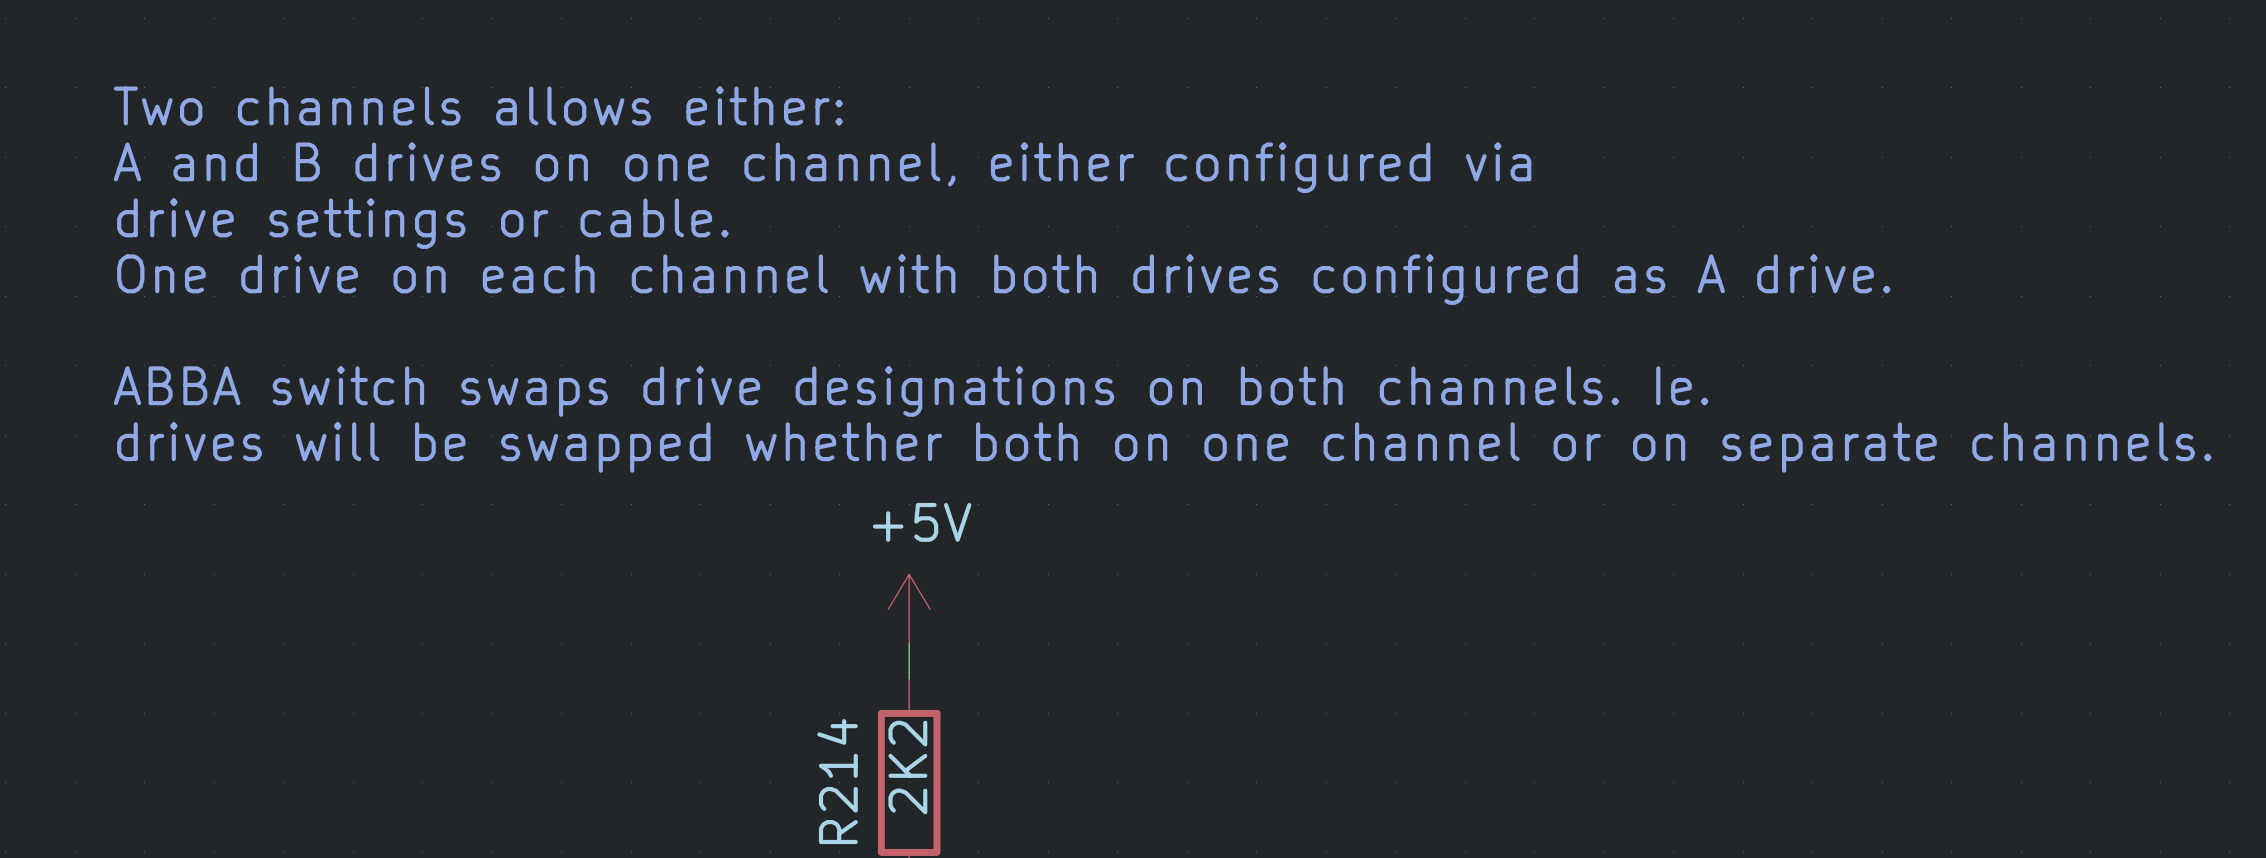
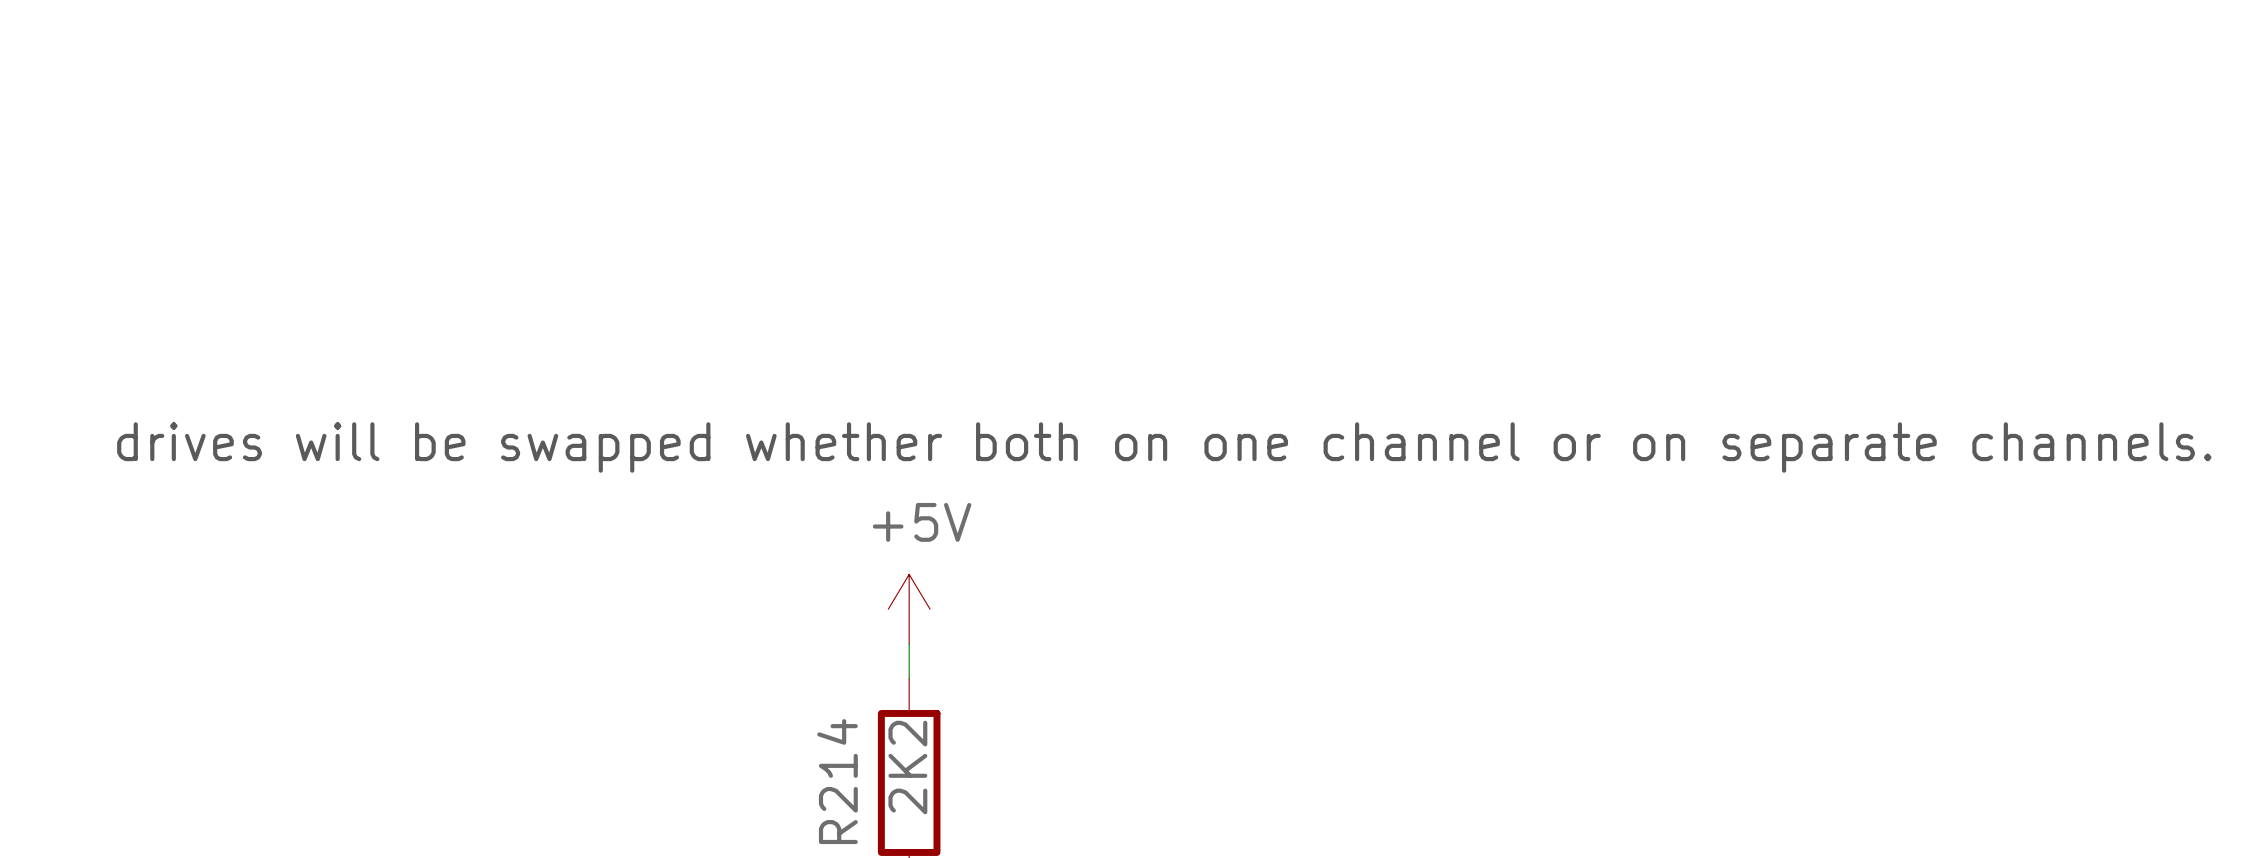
text: Two channels allows either: (478, 105) -> none
text: A and B drives on one channel, either configured via (822, 167) -> none
text: drive settings or cable. (422, 223) -> none
text: One drive on each channel with both drives configured as A drive. (1003, 279) -> none
text: ABBA switch swaps drive designations on both channels. Ie. (911, 391) -> none

